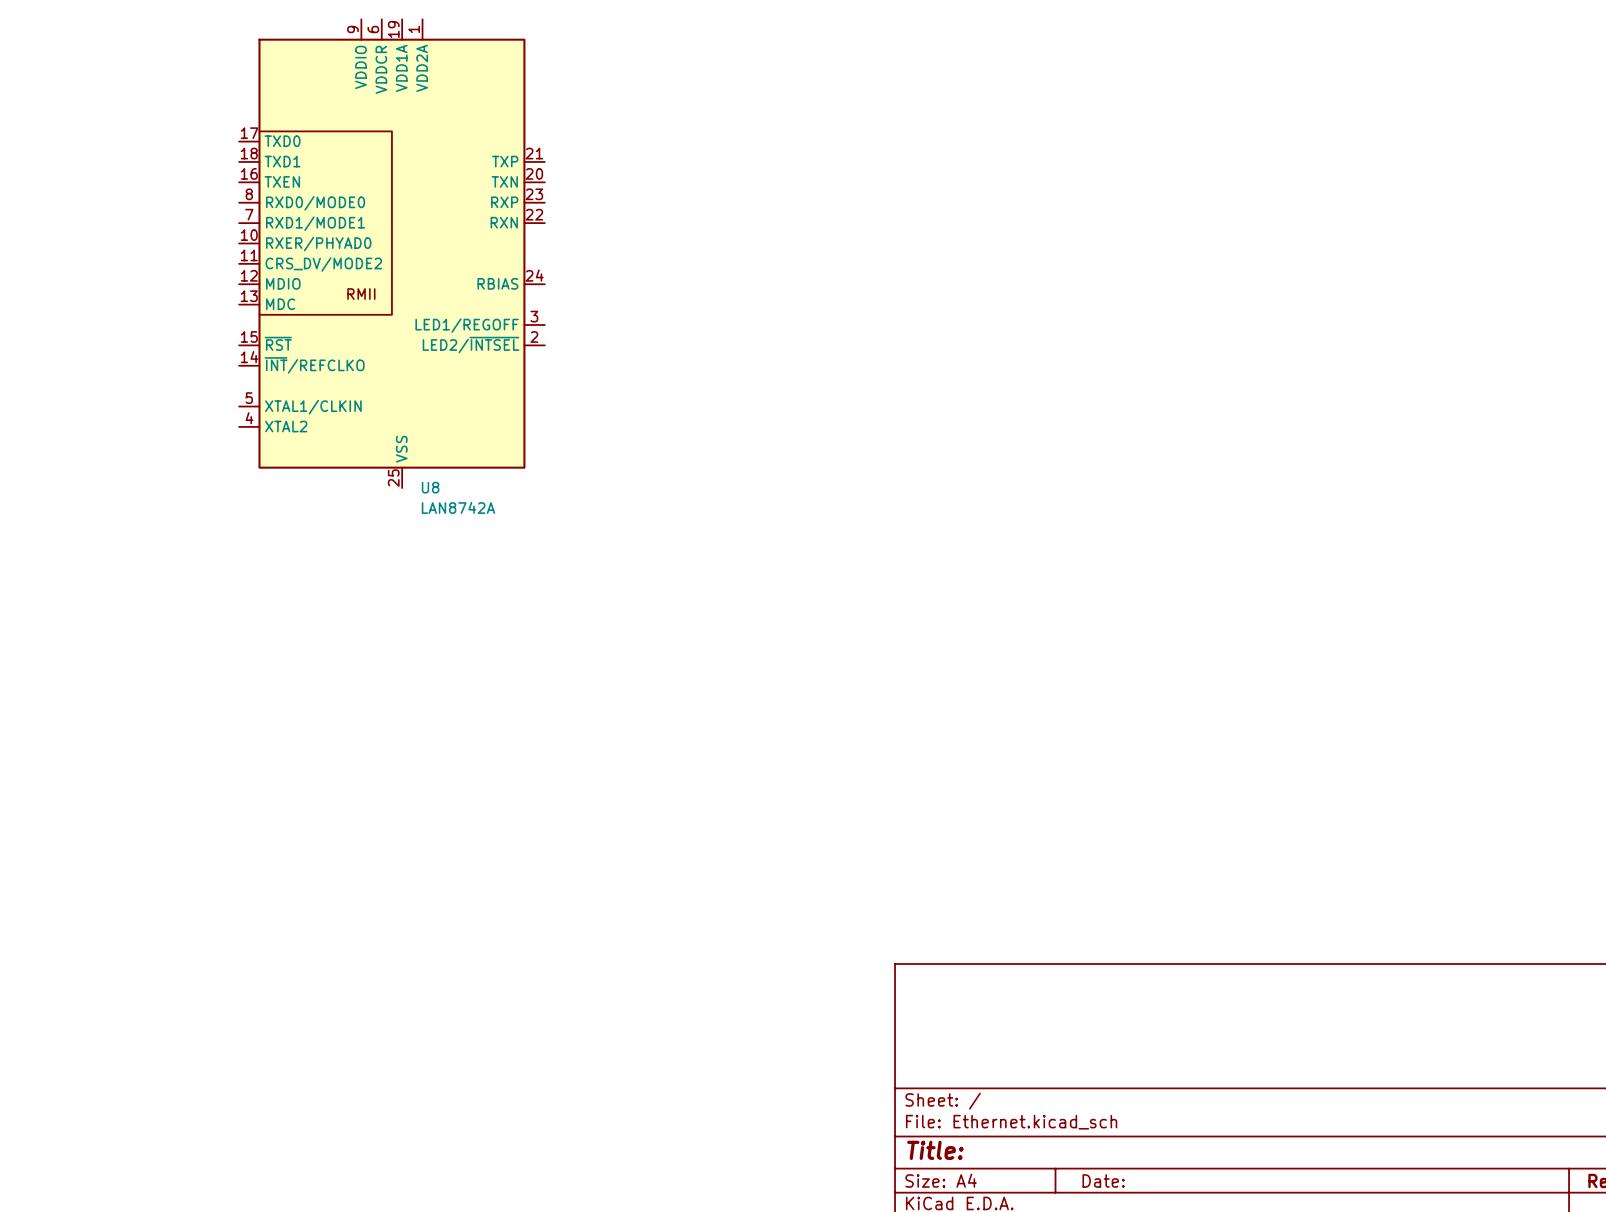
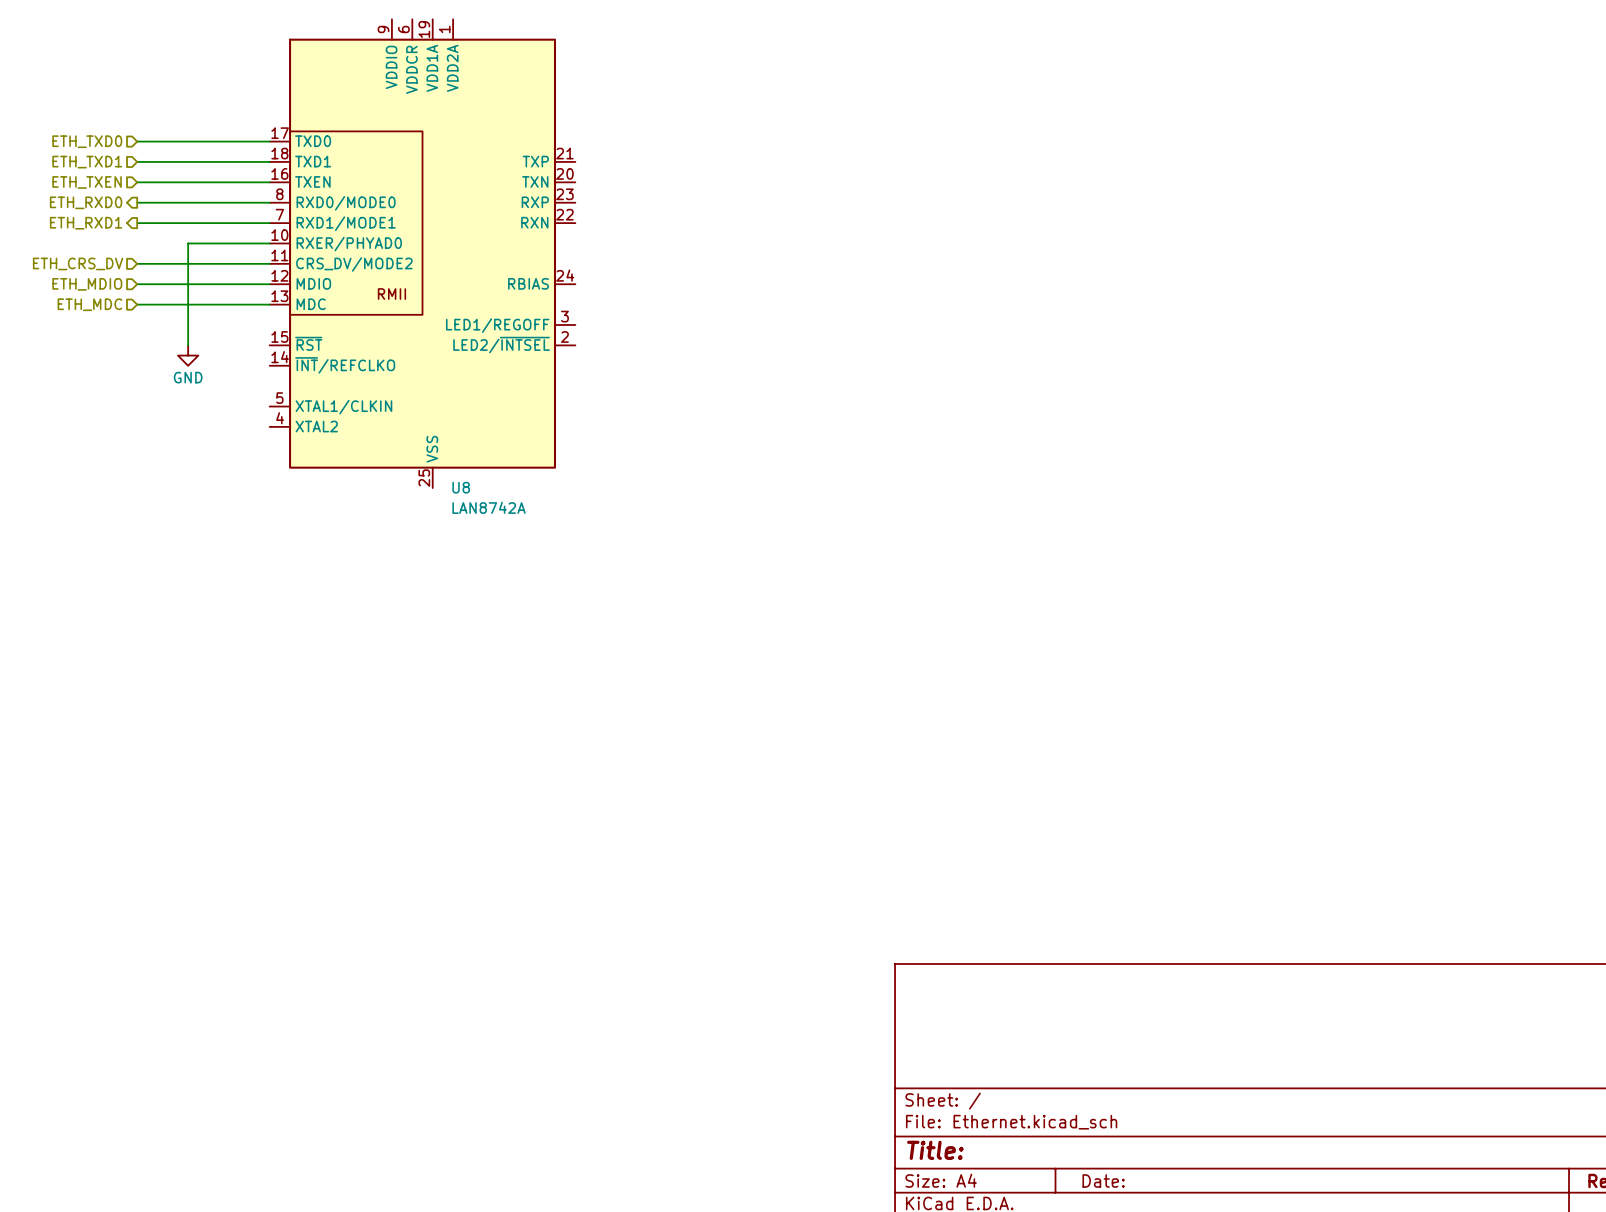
hierarchical label: none -> ETH_TXD0 (87, 141)
wire: none -> (137, 141) (269, 141)
wire: none -> (137, 161) (269, 161)
hierarchical label: none -> ETH_TXD1 (87, 162)
hierarchical label: none -> ETH_TXEN (87, 182)
wire: none -> (137, 182) (269, 182)
hierarchical label: none -> ETH_RXD0 (86, 202)
wire: none -> (137, 202) (269, 202)
hierarchical label: none -> ETH_RXD1 (86, 223)
wire: none -> (137, 223) (269, 223)
wire: none -> (269, 243) (188, 243) (188, 345)
U8 position: (391, 253) -> (422, 253)
hierarchical label: none -> ETH_CRS_DV (78, 263)
wire: none -> (137, 263) (269, 263)
hierarchical label: none -> ETH_MDIO (87, 284)
wire: none -> (137, 284) (269, 284)
hierarchical label: none -> ETH_MDC (89, 304)
wire: none -> (137, 304) (269, 304)
power symbol: none -> GND (188, 355)

